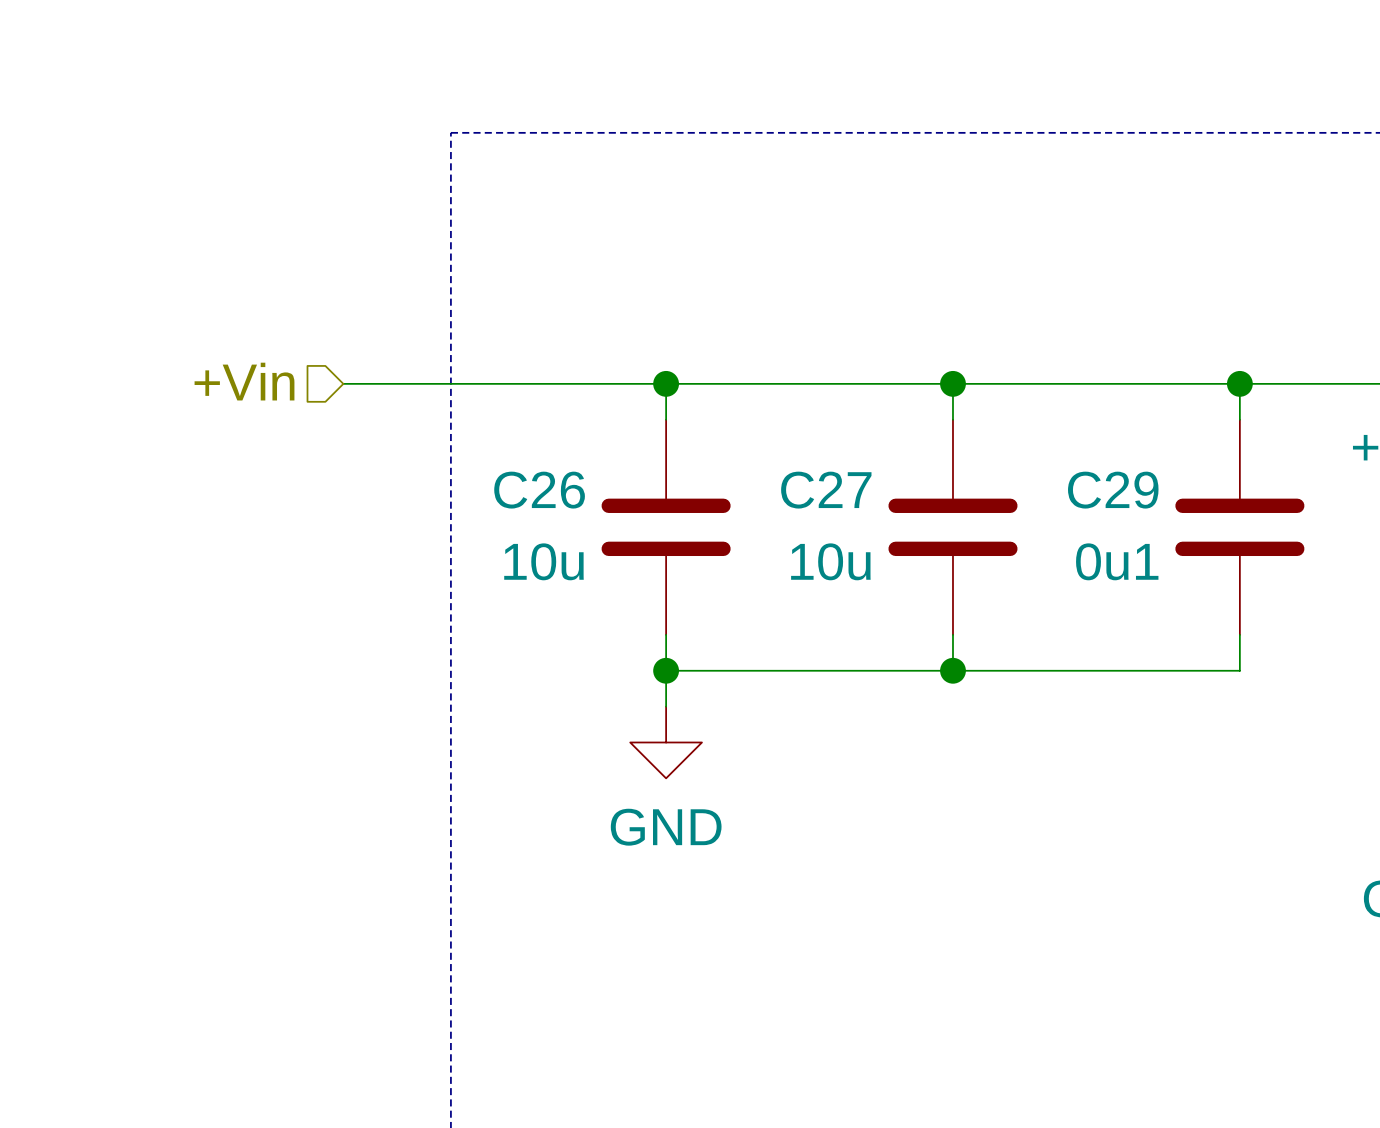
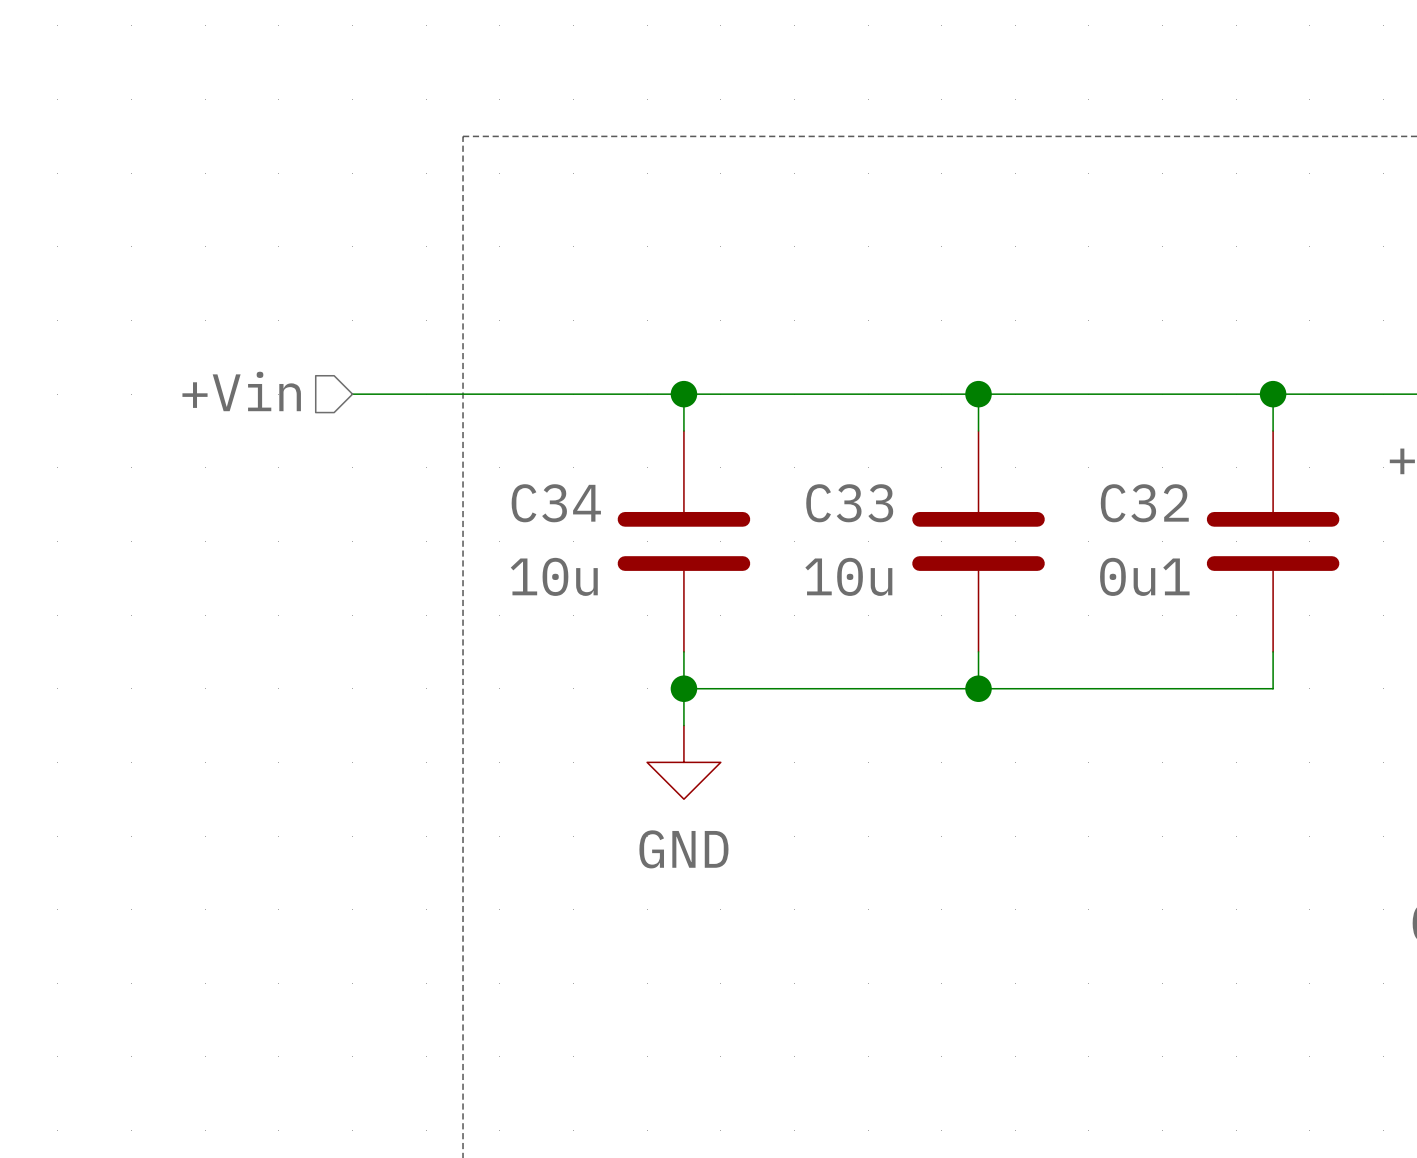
C26 name: C26 (539, 490) -> C34 (556, 503)
C27 name: C27 (826, 490) -> C33 (849, 503)
C29 name: C29 (1113, 490) -> C32 (1144, 503)

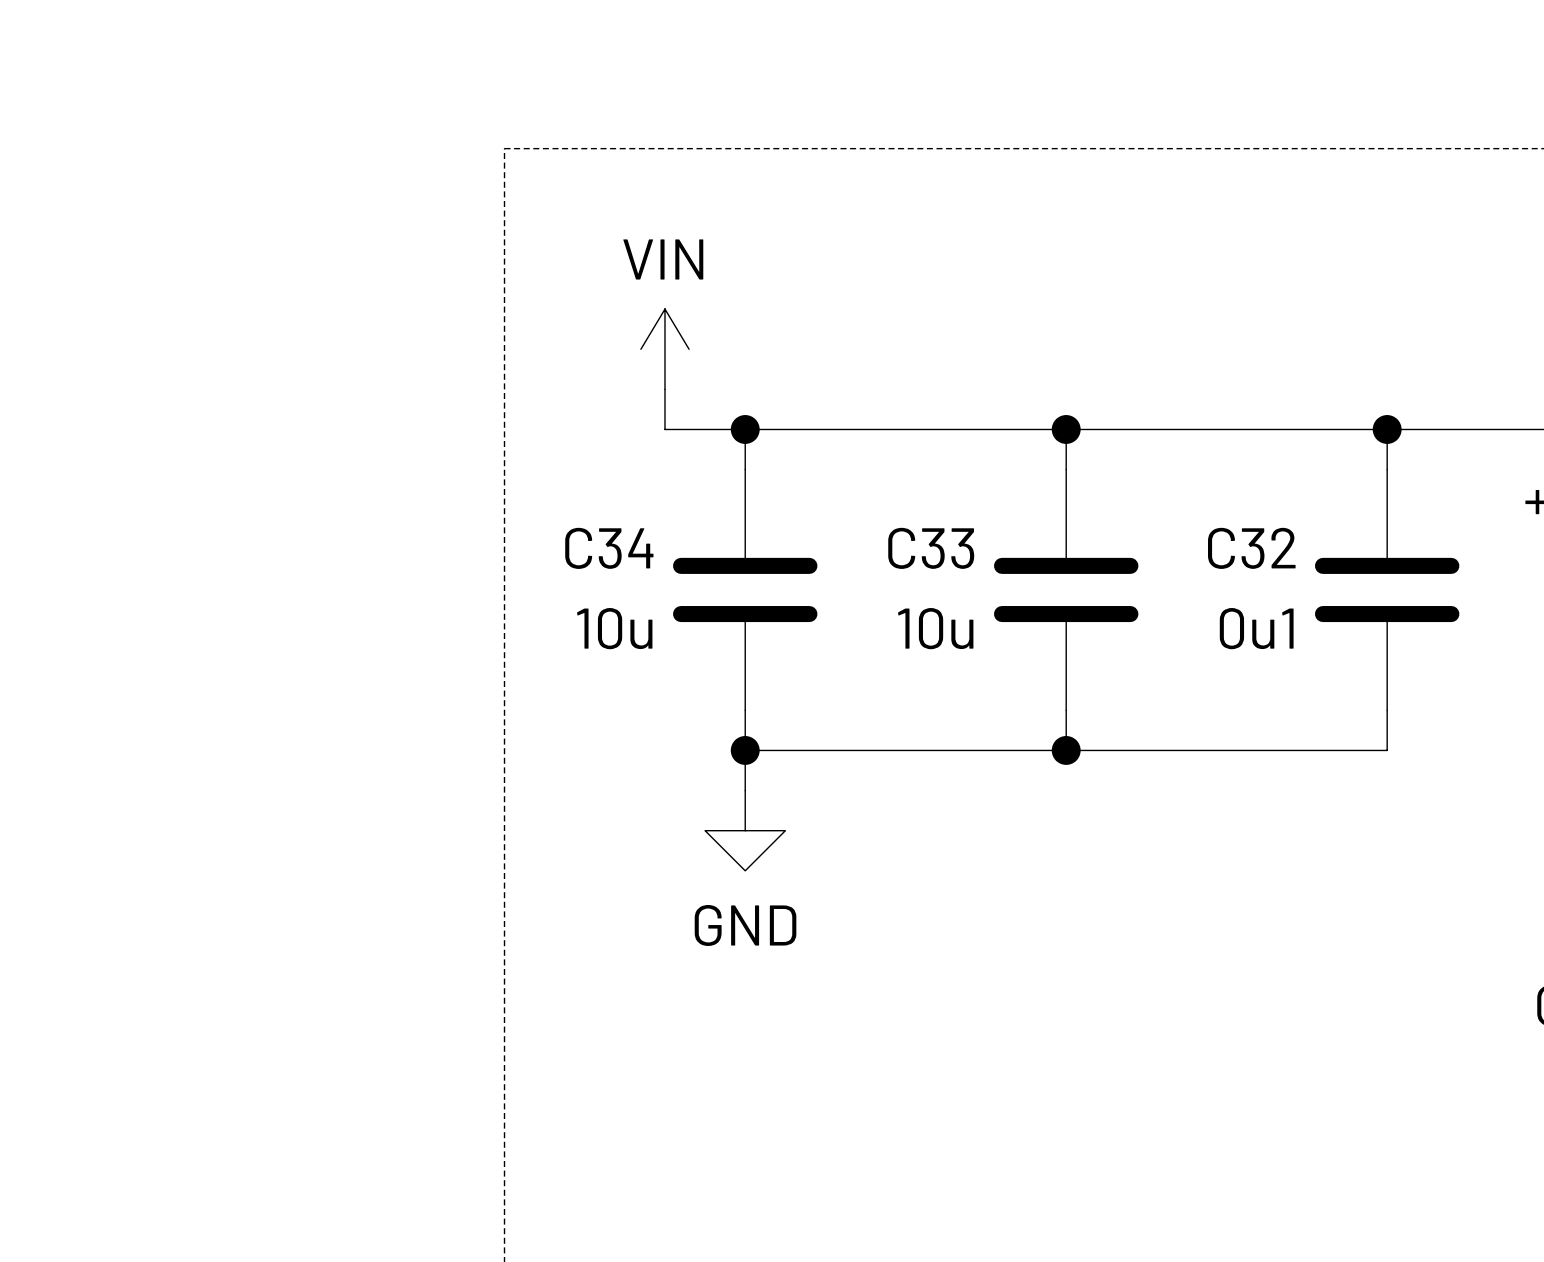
power symbol: none -> VIN (664, 349)
hierarchical label: +Vin (241, 391) -> none
wire: (352, 394) (610, 394) -> (664, 389) (664, 429)

